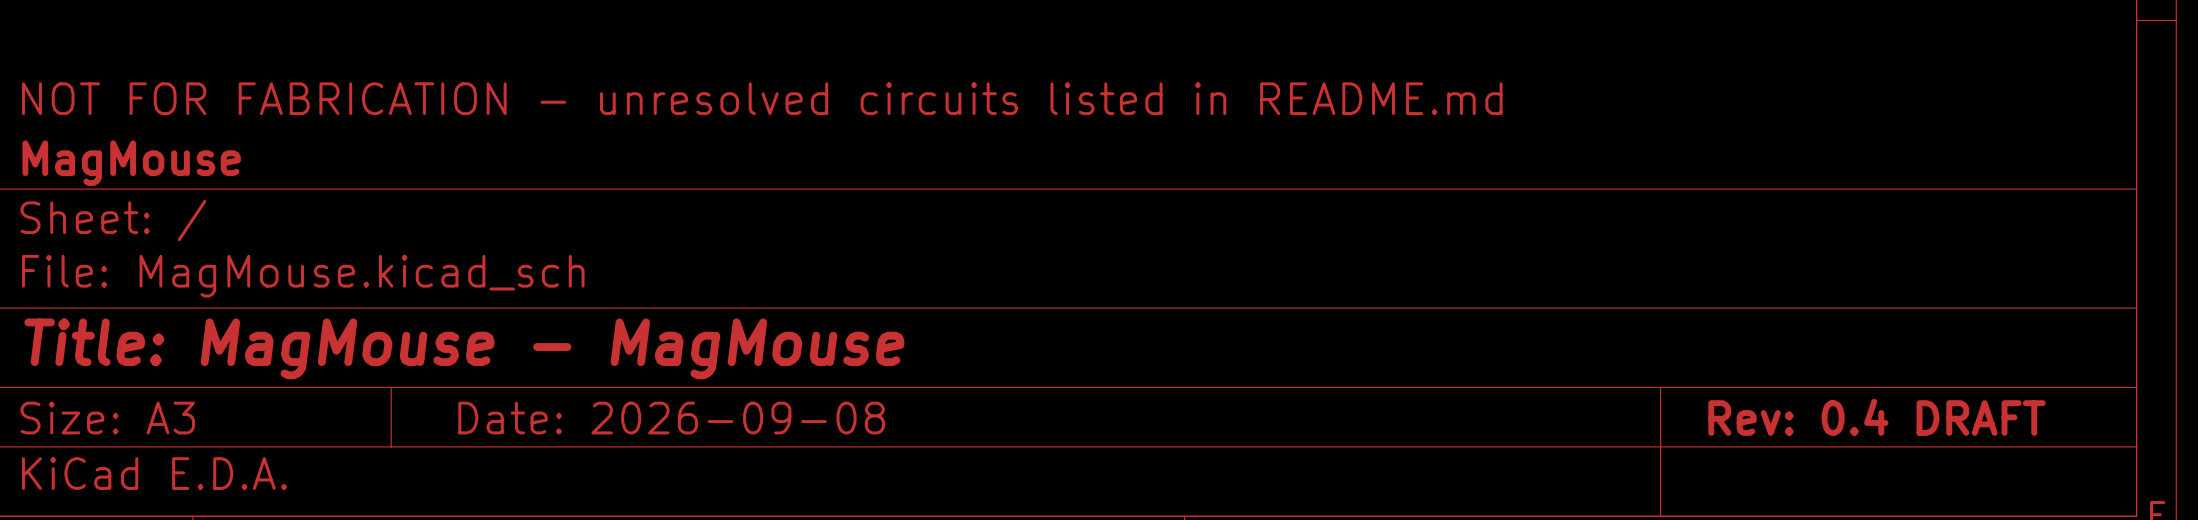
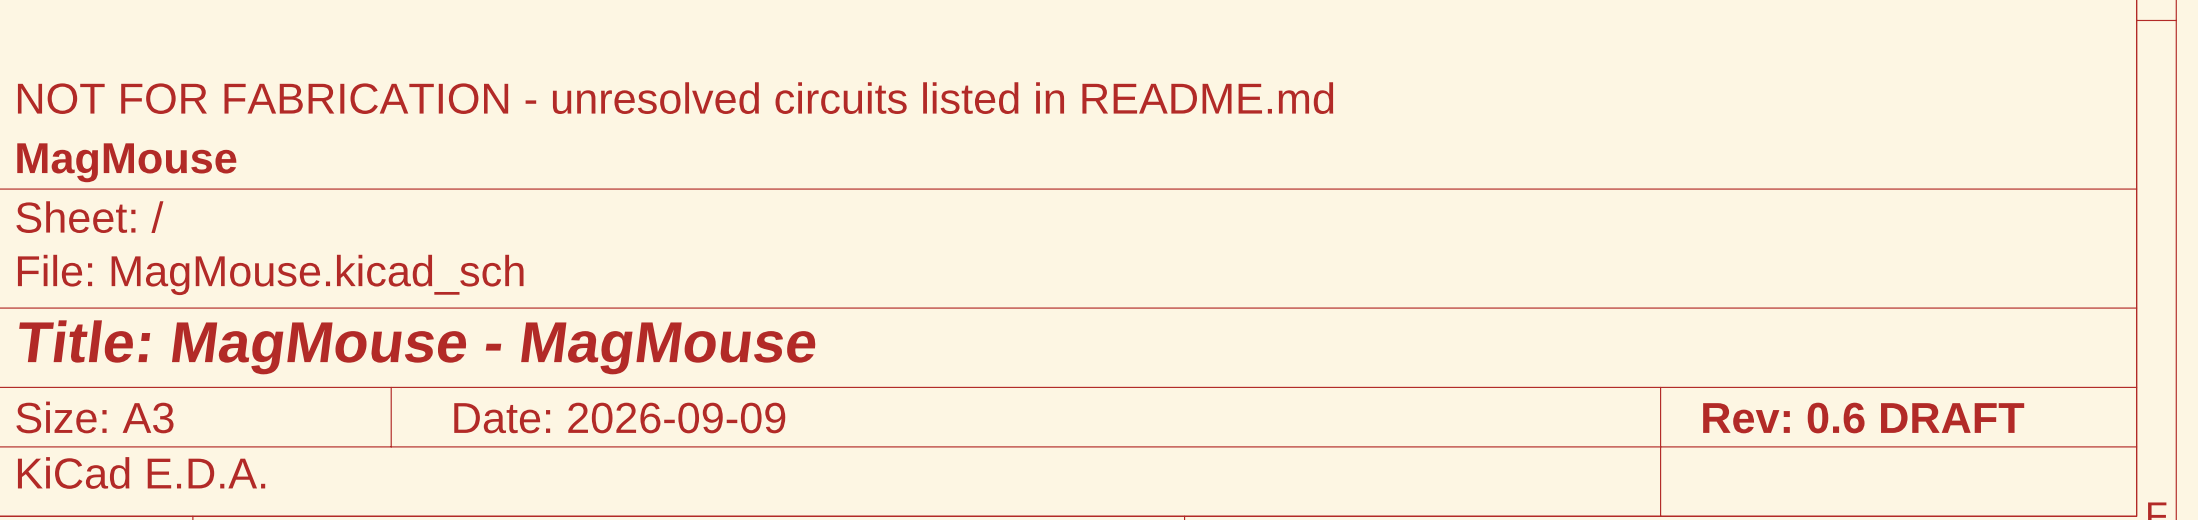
title block: Rev: 0.4 DRAFT (1877, 417) -> Rev: 0.6 DRAFT (1863, 418)
title block: Date: 2026-09-08 (671, 418) -> Date: 2026-09-09 (619, 418)

